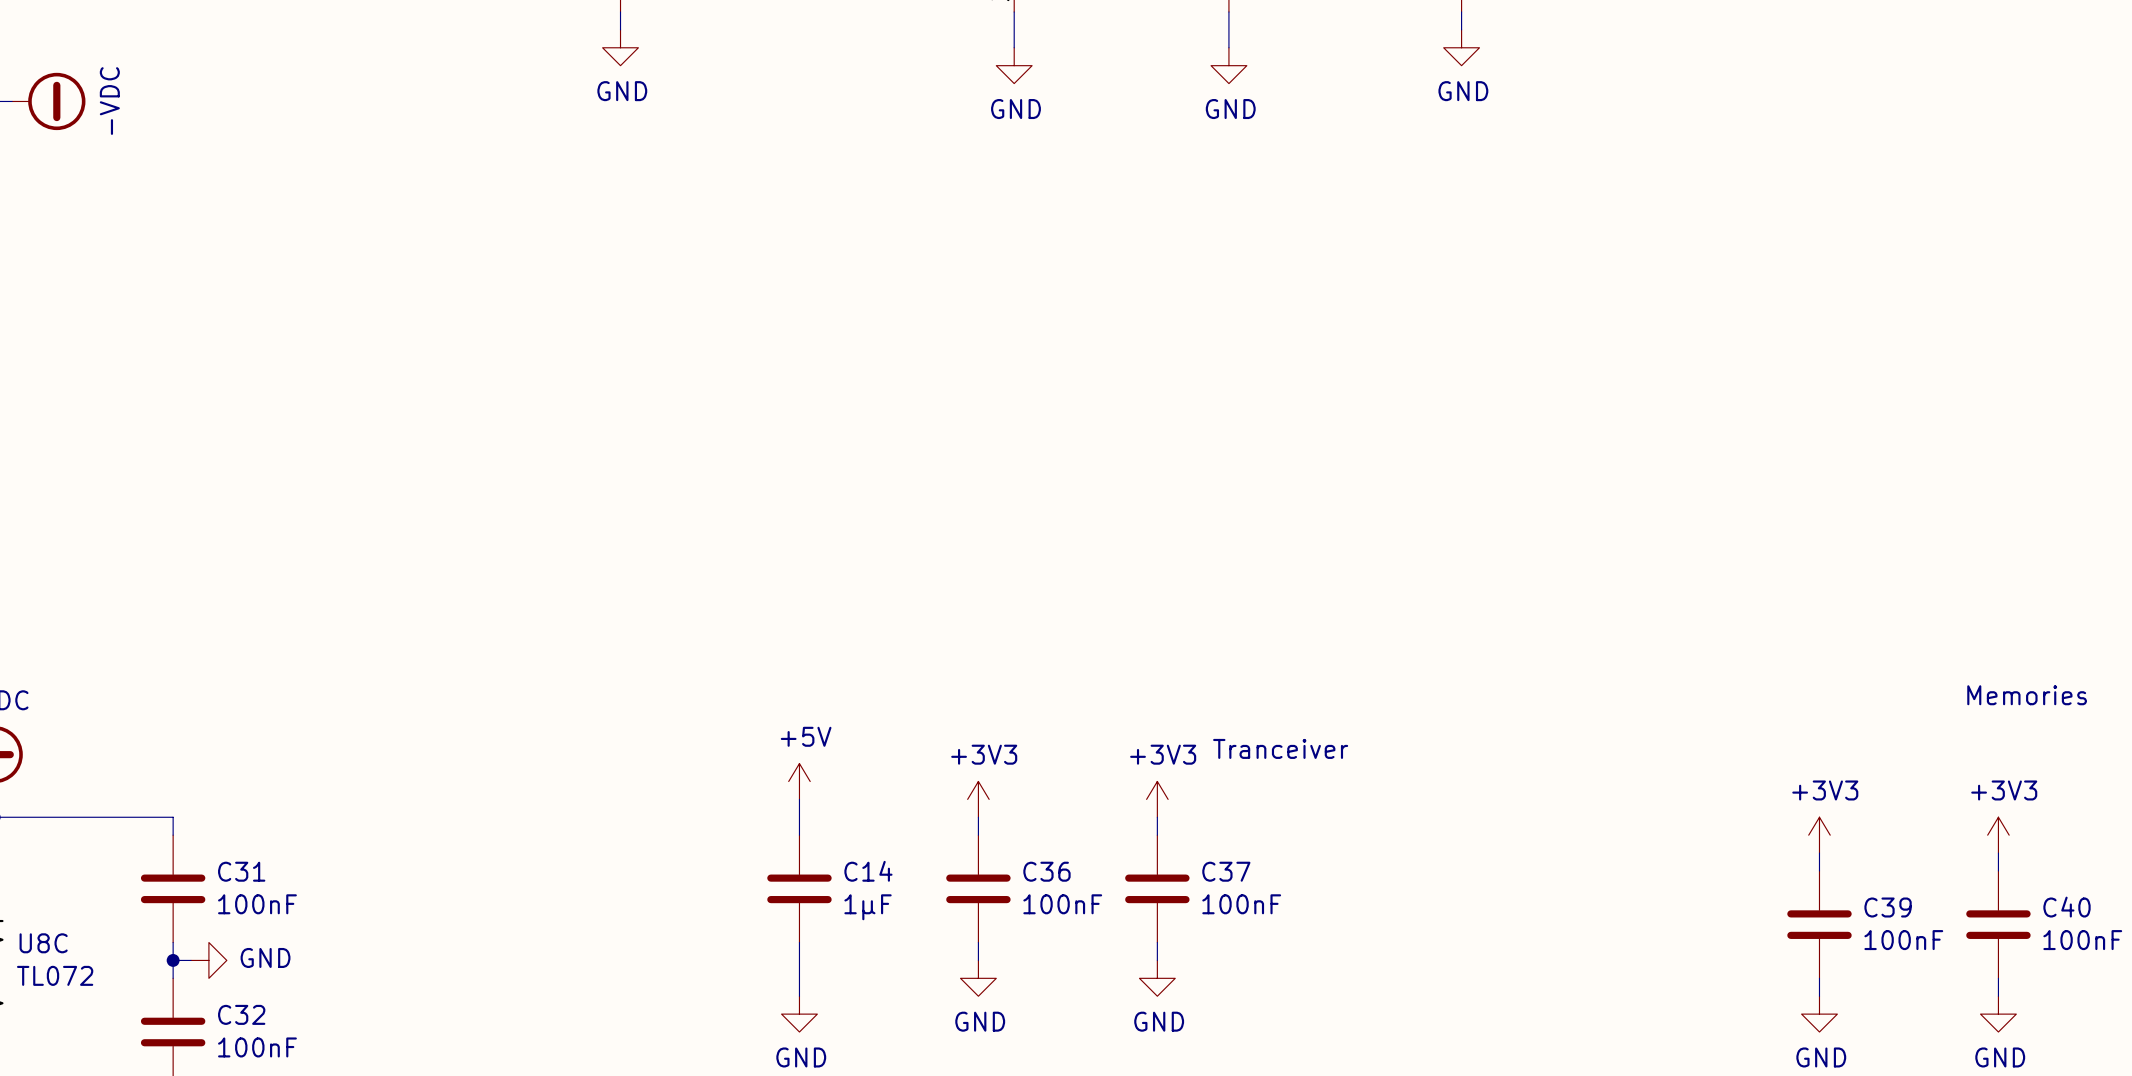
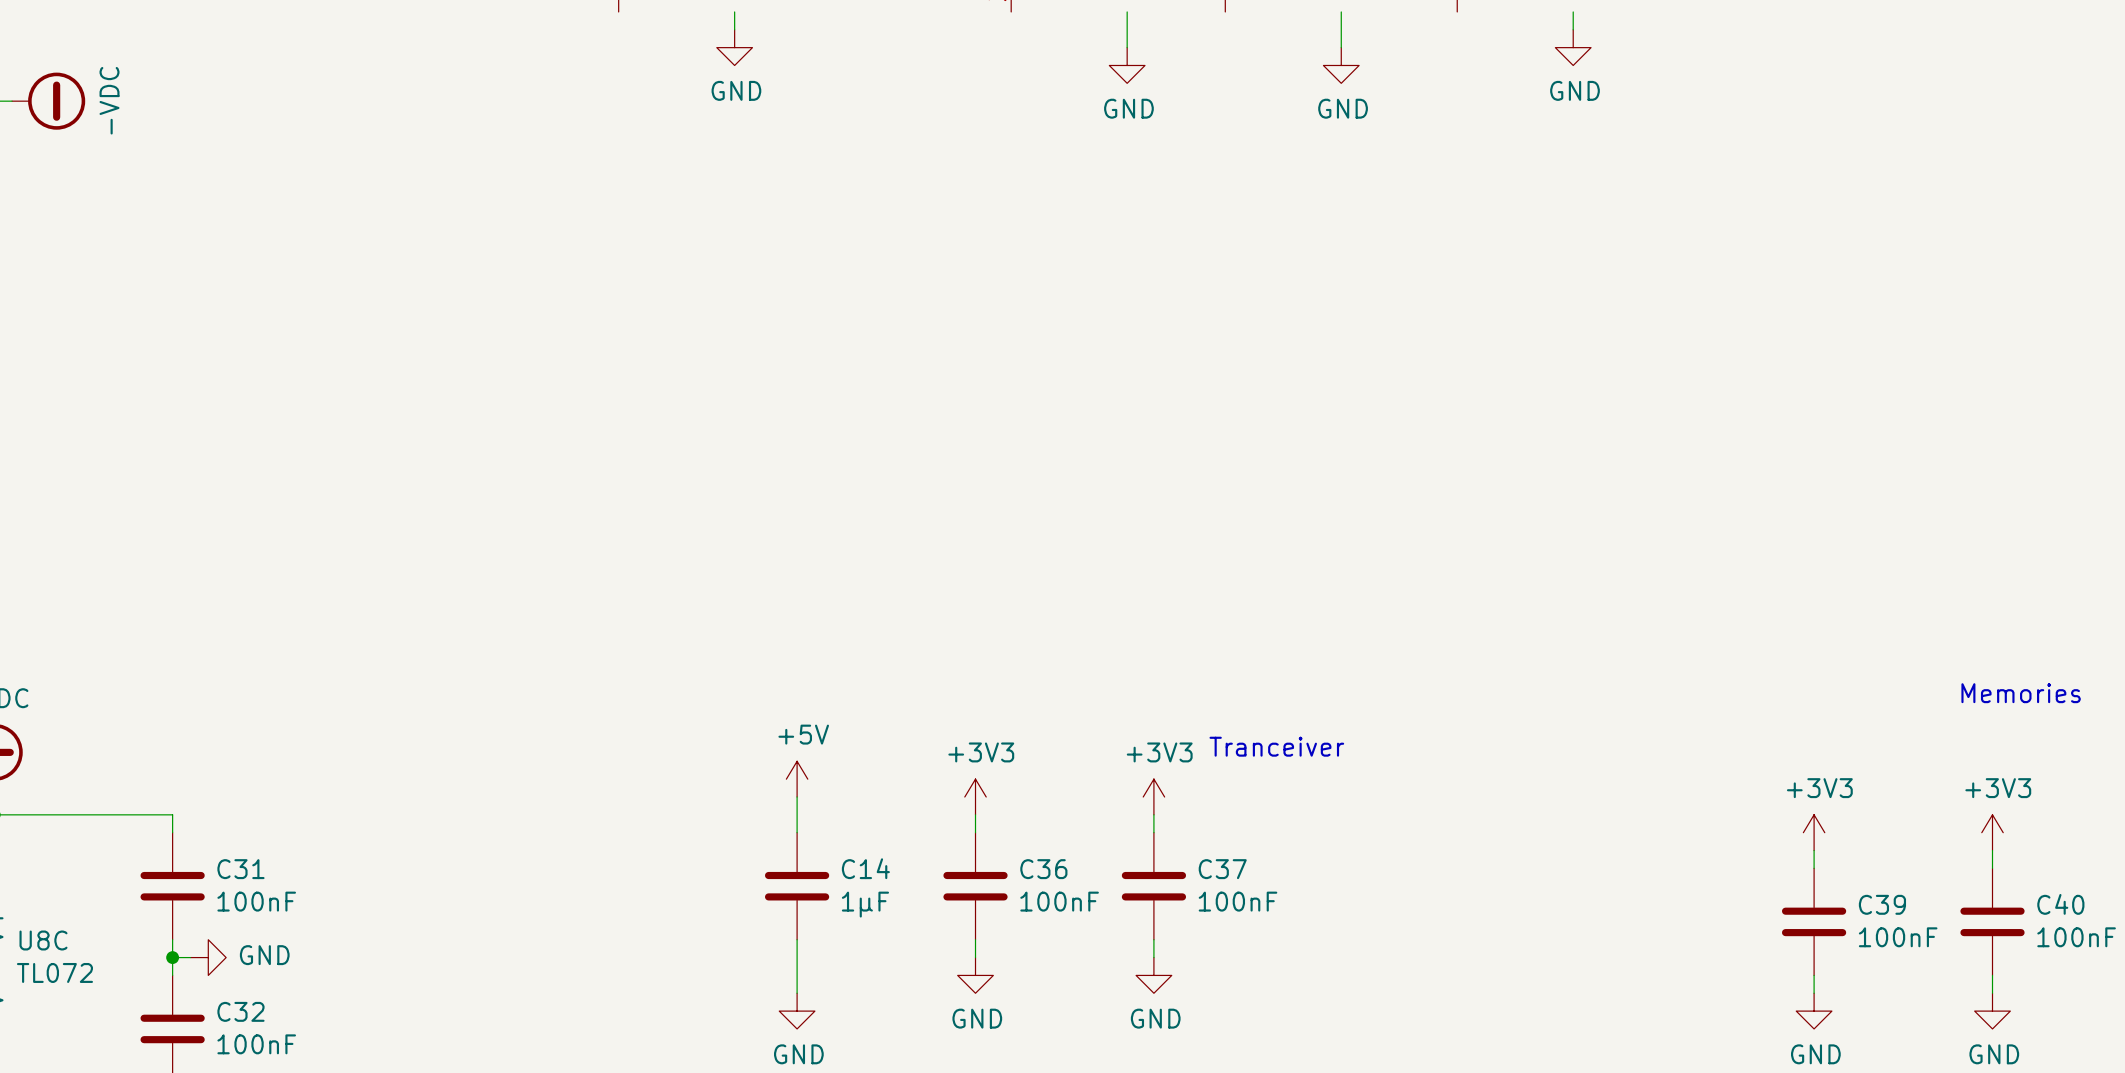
wire: (620, 11) (620, 29) -> (734, 11) (734, 29)
wire: (1014, 11) (1014, 47) -> (1127, 11) (1127, 47)
wire: (1228, 11) (1228, 47) -> (1341, 11) (1341, 47)
wire: (1461, 11) (1461, 29) -> (1573, 11) (1573, 29)
power symbol position: GND (620, 47) -> GND (734, 47)
power symbol: GND (1461, 47) -> none
power symbol: none -> GND (1573, 47)
power symbol: GND (1014, 65) -> none
power symbol: none -> GND (1127, 65)
power symbol: GND (1228, 65) -> none
power symbol: none -> GND (1341, 65)

